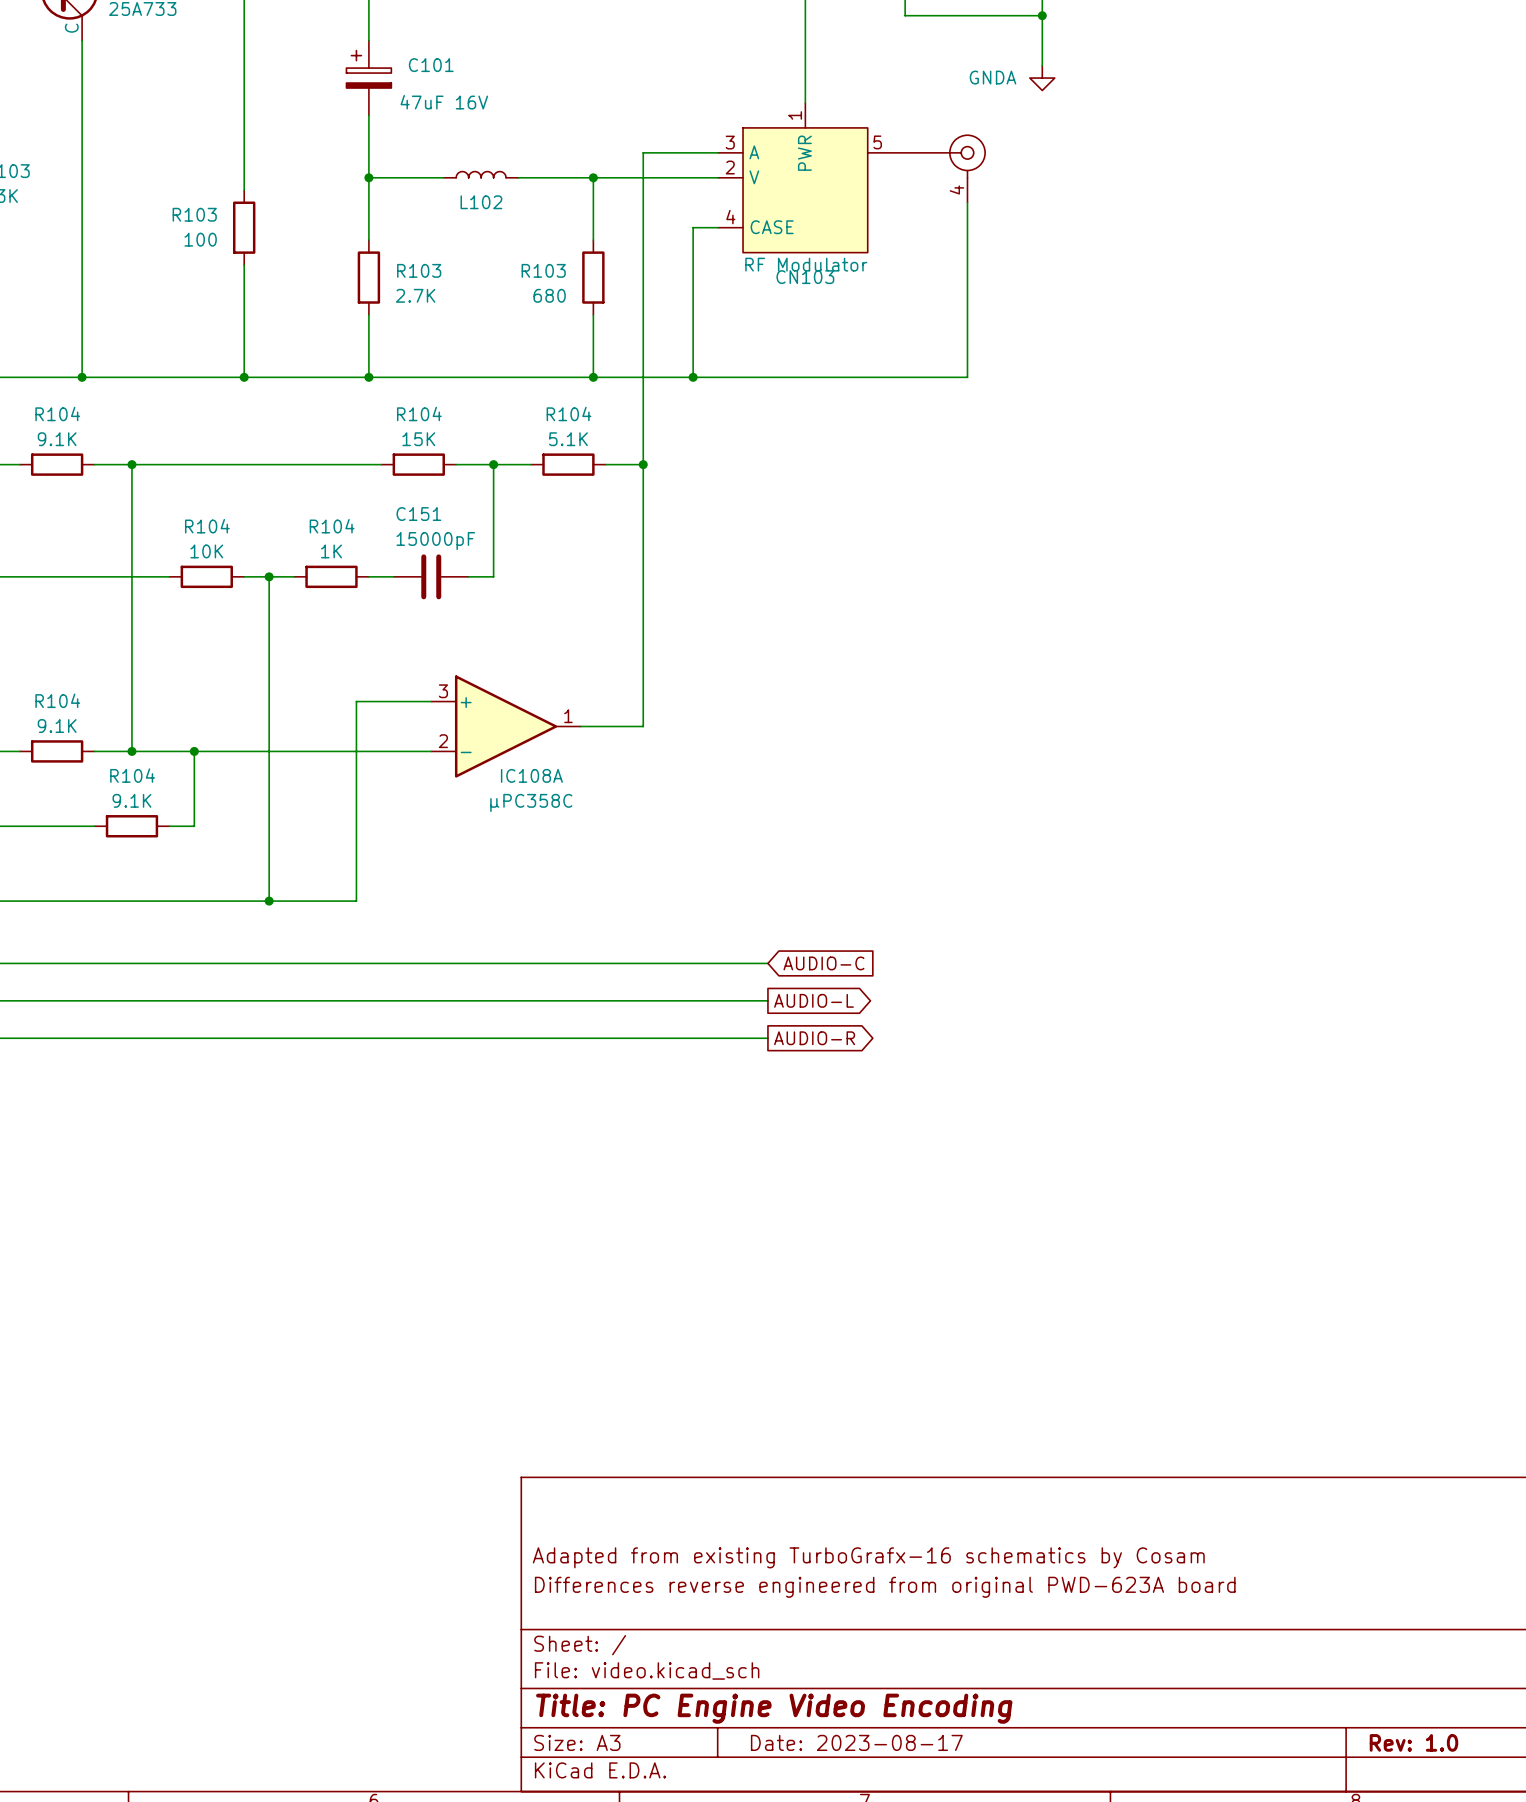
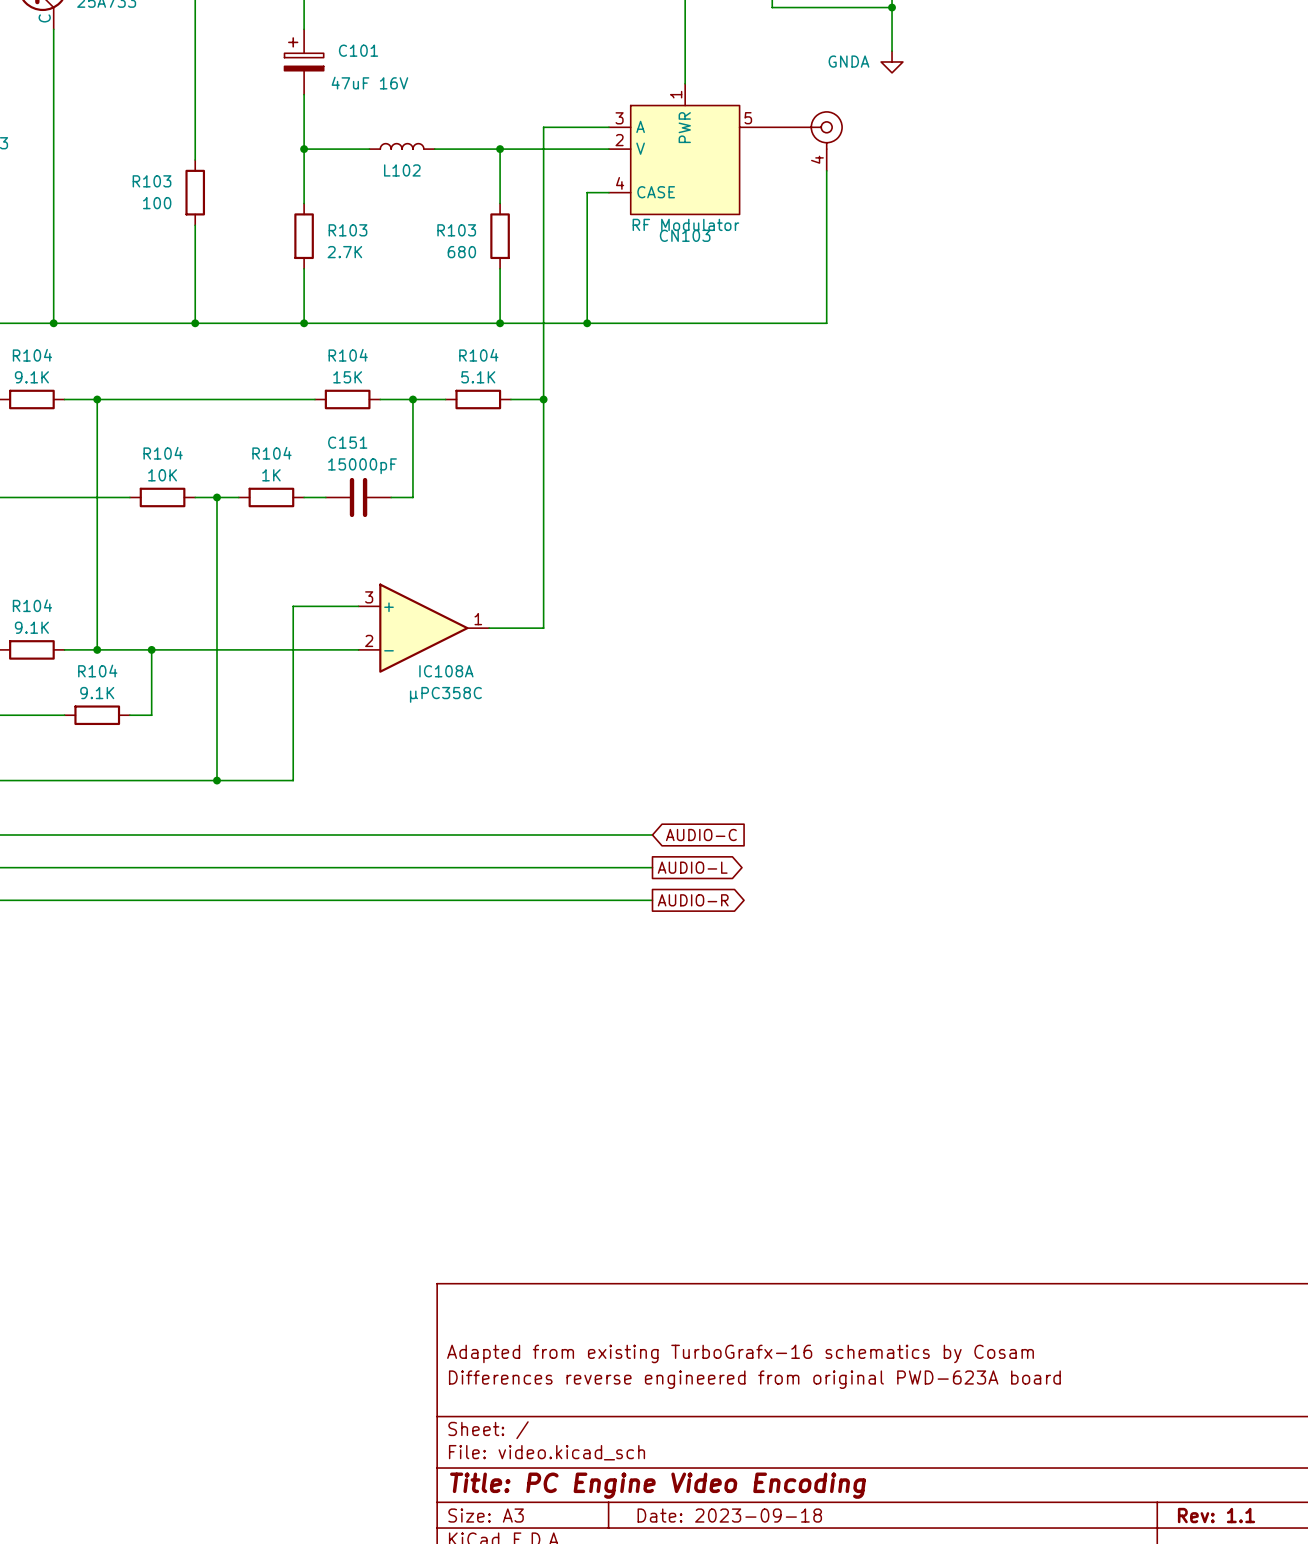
title block: Date: 2023-08-17 (856, 1742) -> Date: 2023-09-18 (729, 1515)
title block: Rev: 1.0 (1413, 1742) -> Rev: 1.1 (1216, 1515)

